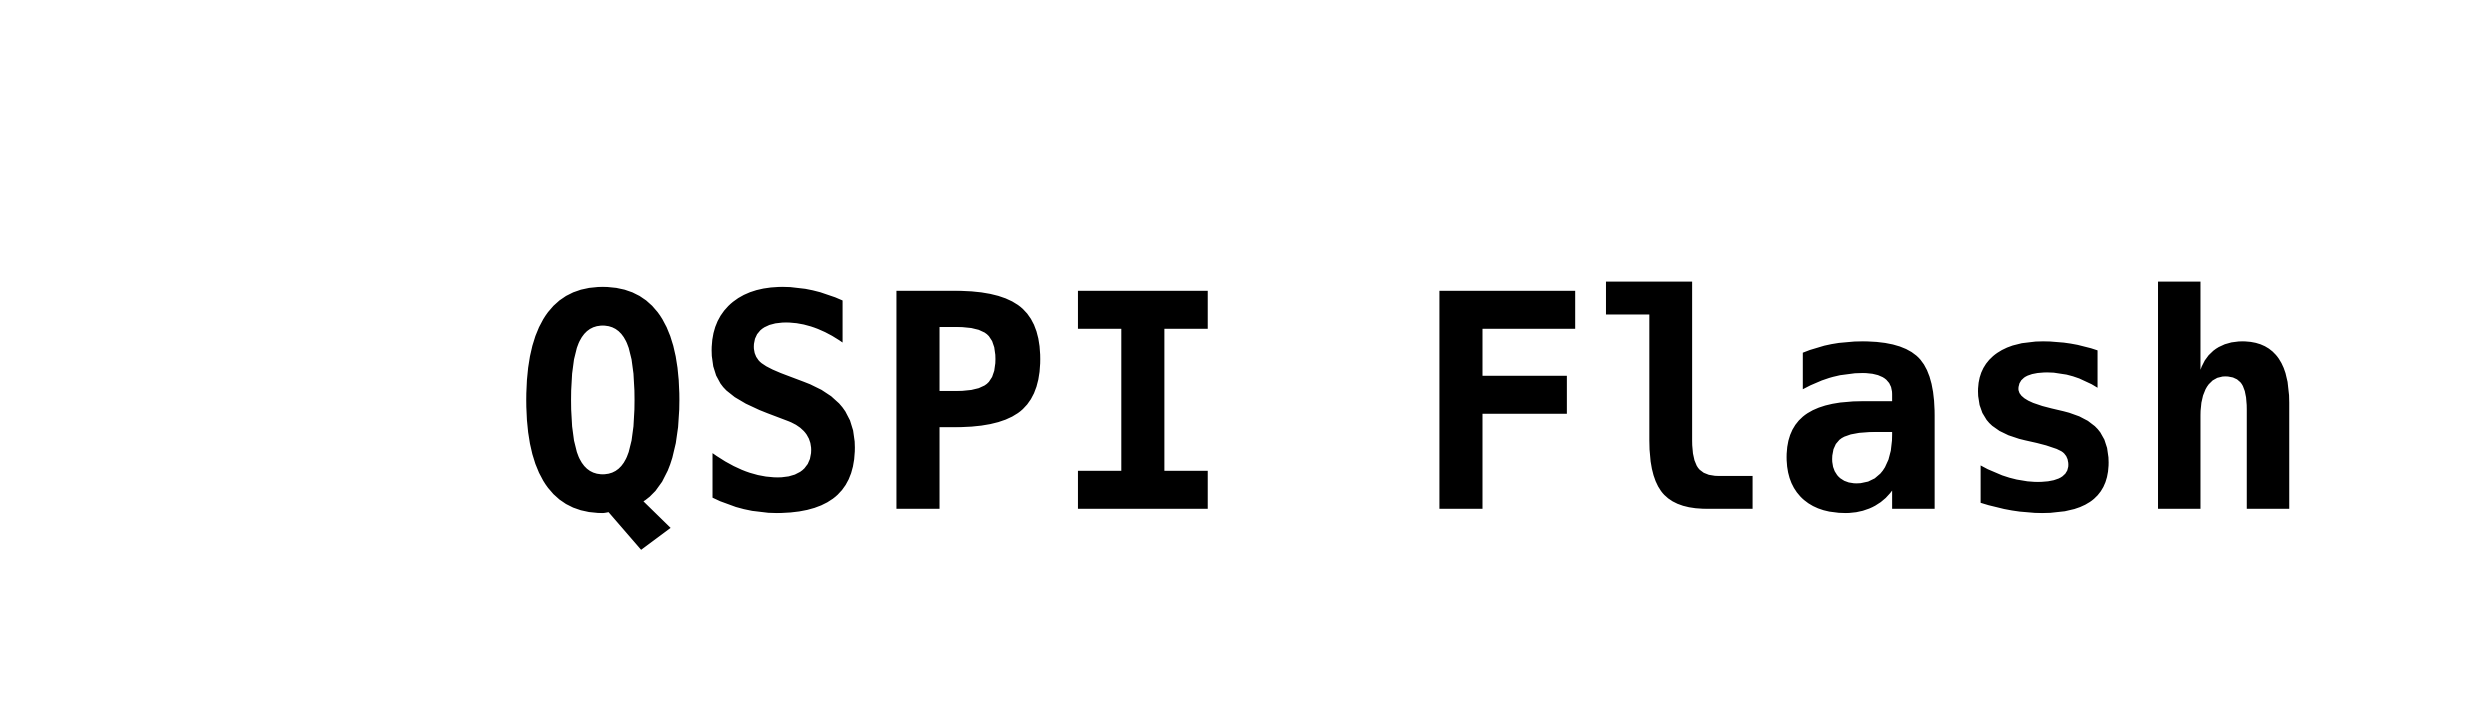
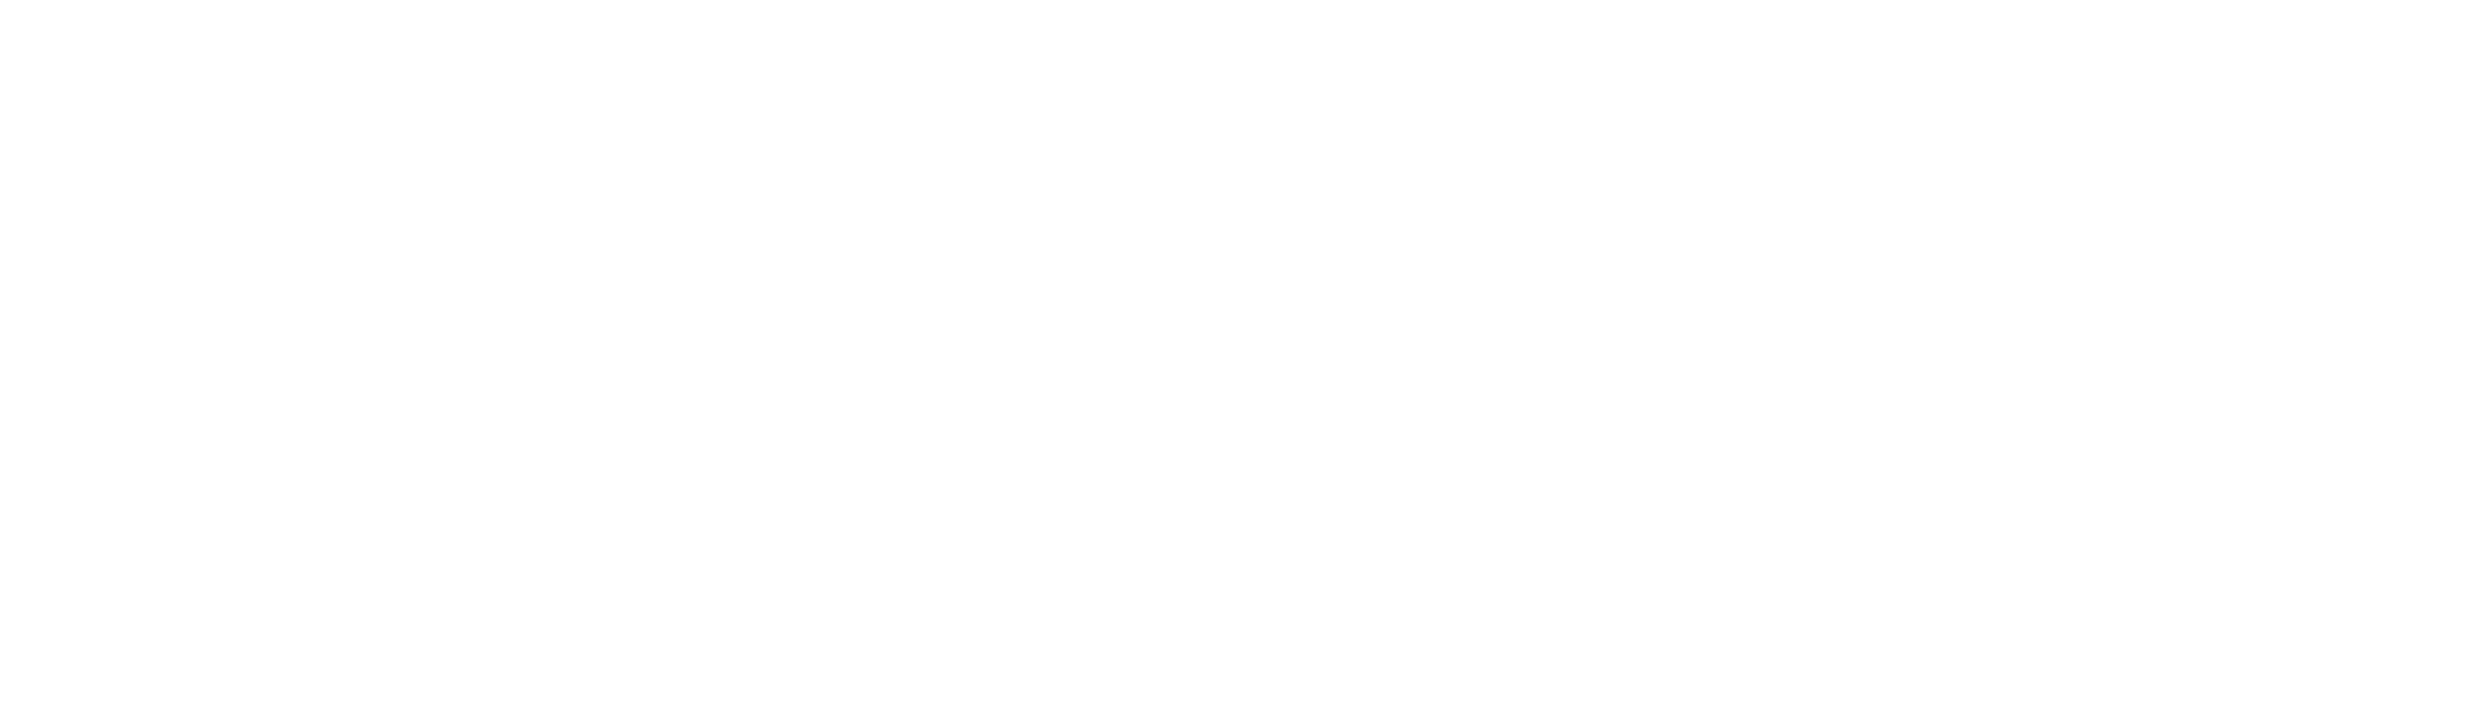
text: QSPI Flash (1407, 415) -> none

